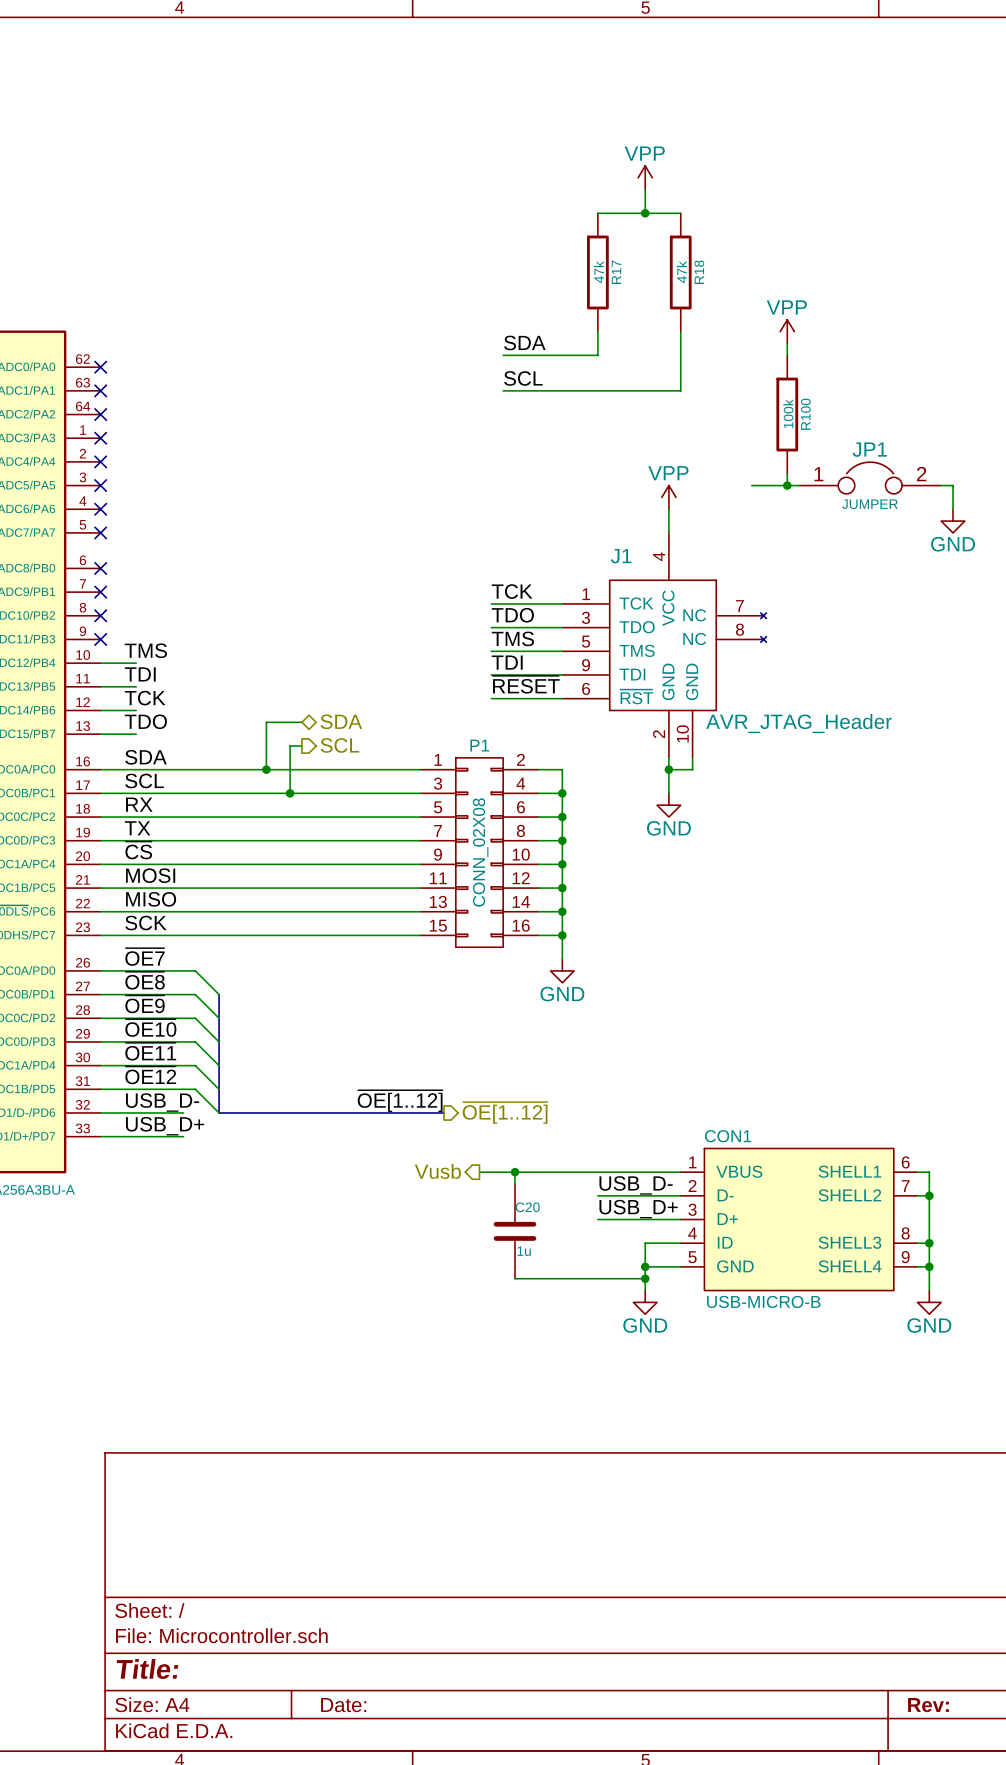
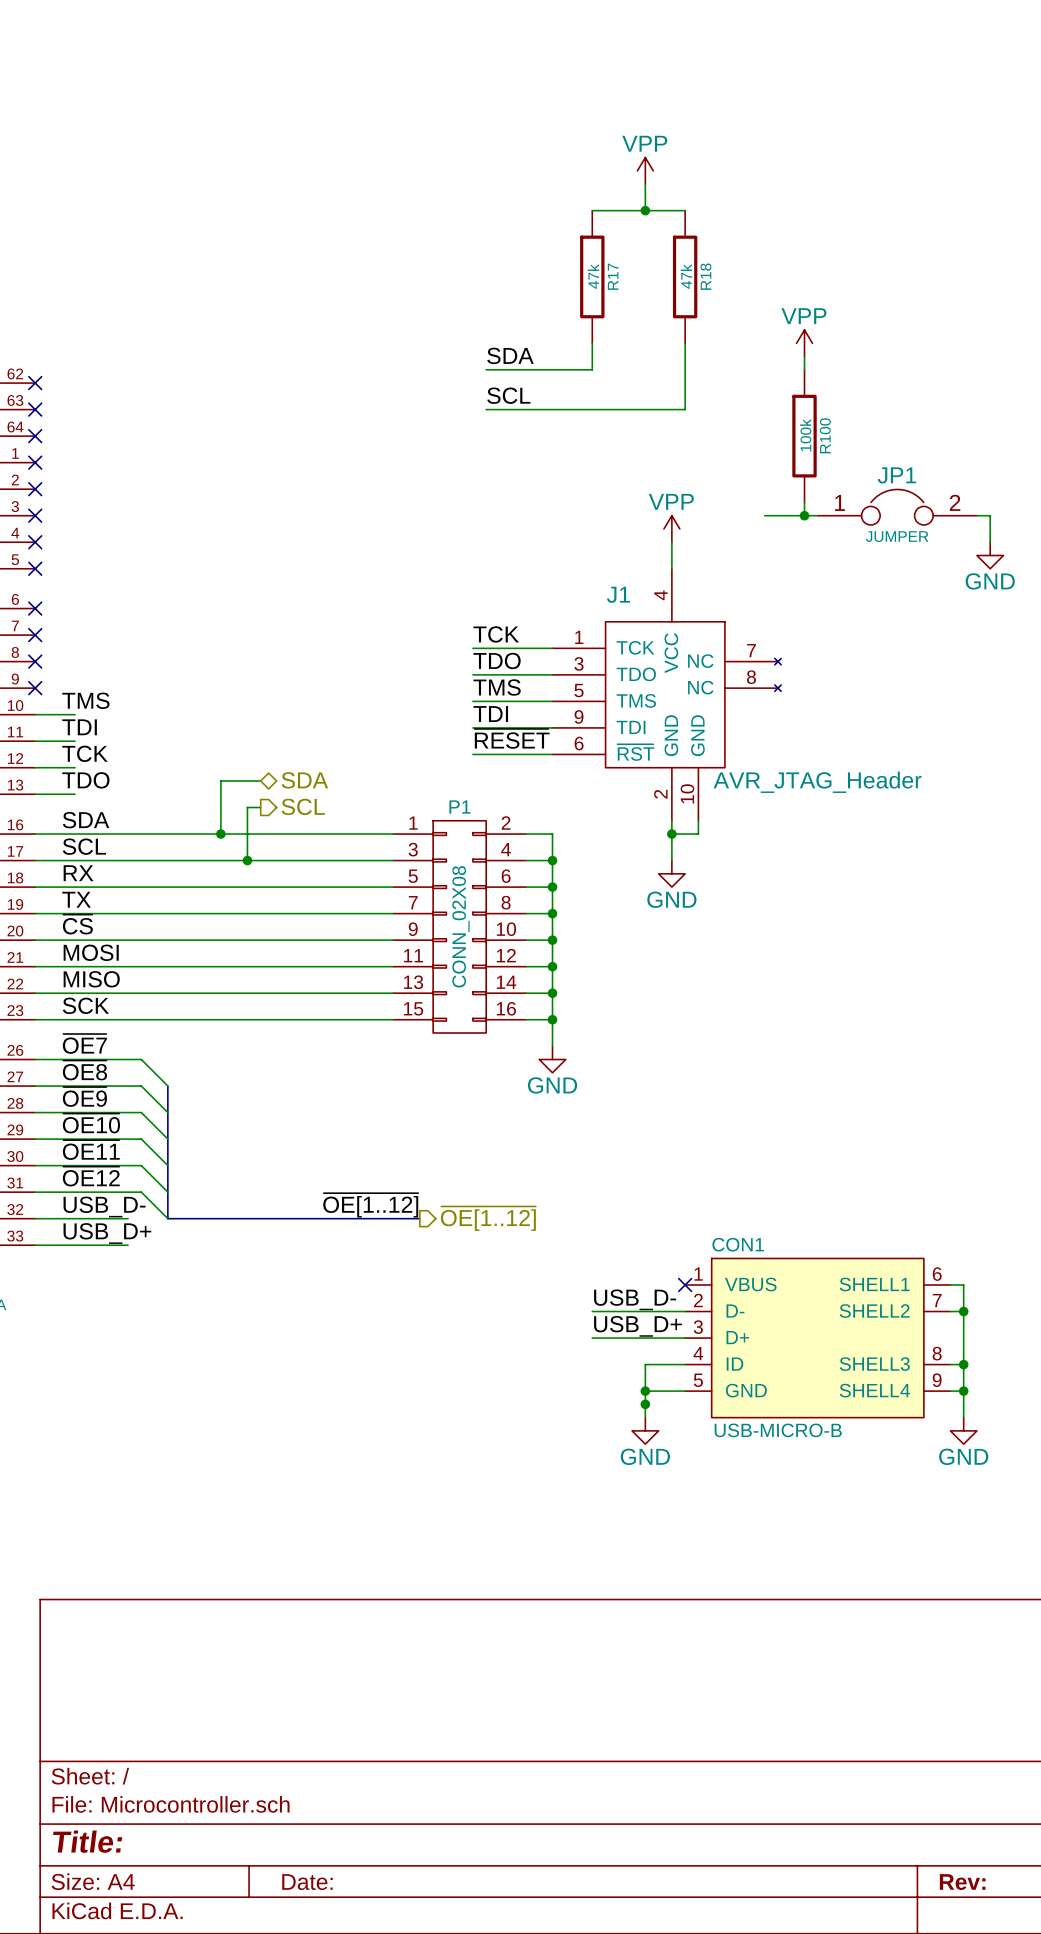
hierarchical label: Vusb (437, 1171) -> none
wire: (479, 1172) (680, 1172) -> none
wire: (515, 1172) (515, 1184) -> none
junction: (515, 1172) -> none
no-connect mark: none -> (685, 1285)
C20: 1u (515, 1231) -> none
wire: (515, 1278) (645, 1278) -> none

